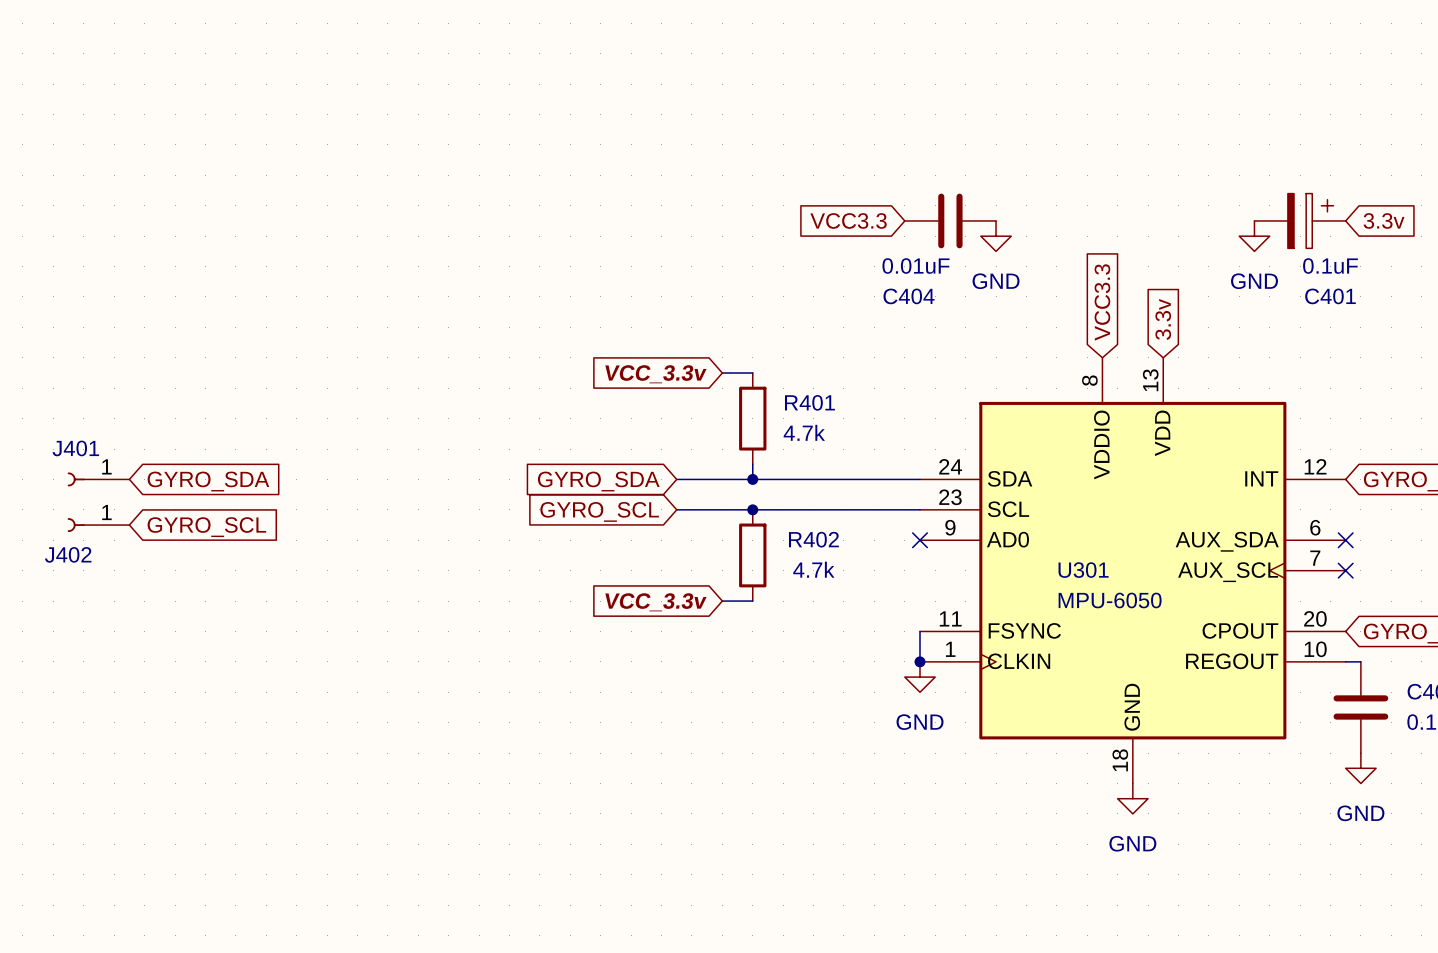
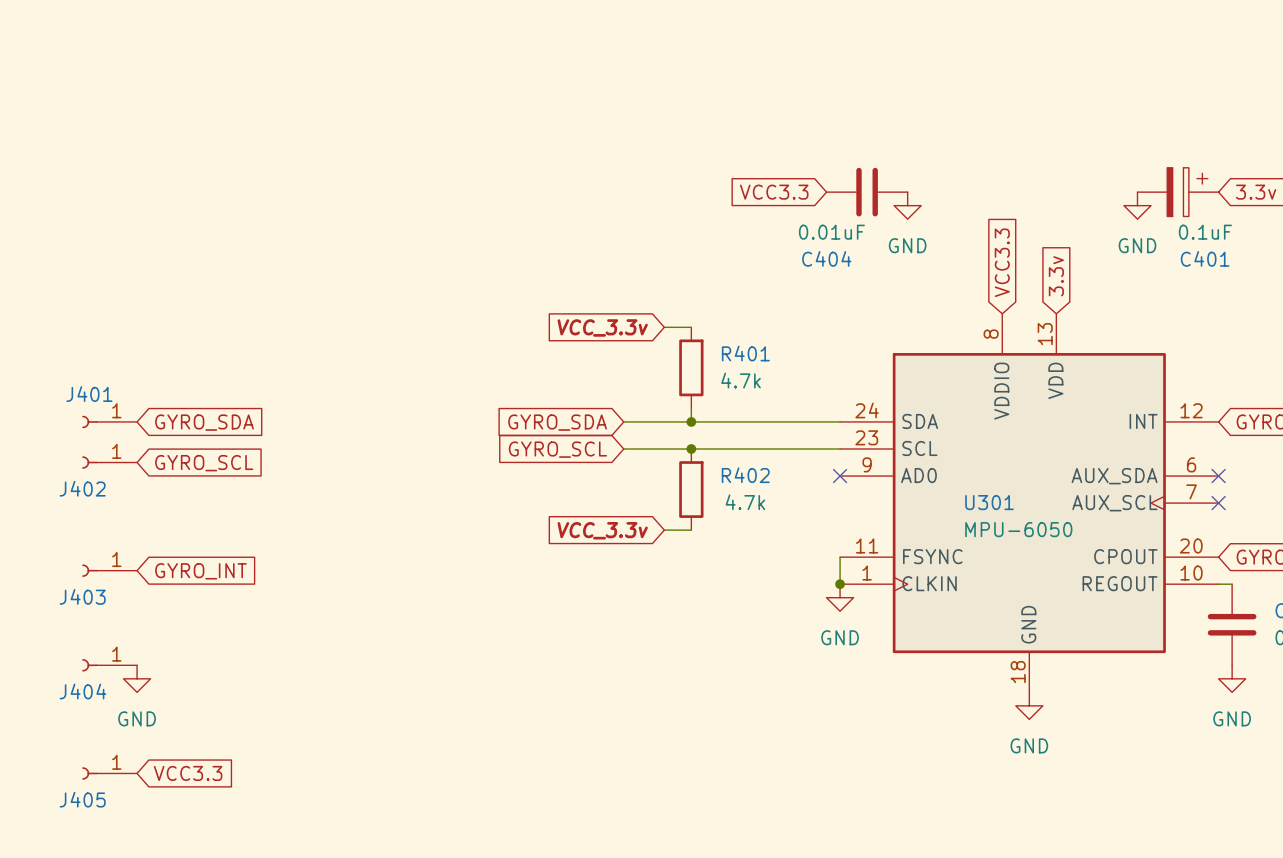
J403: none -> (109, 570)
global label: none -> GYRO_INT (200, 571)
J404: none -> (109, 665)
power symbol: none -> GND (137, 678)
J405: none -> (109, 773)
global label: none -> VCC3.3 (188, 773)

